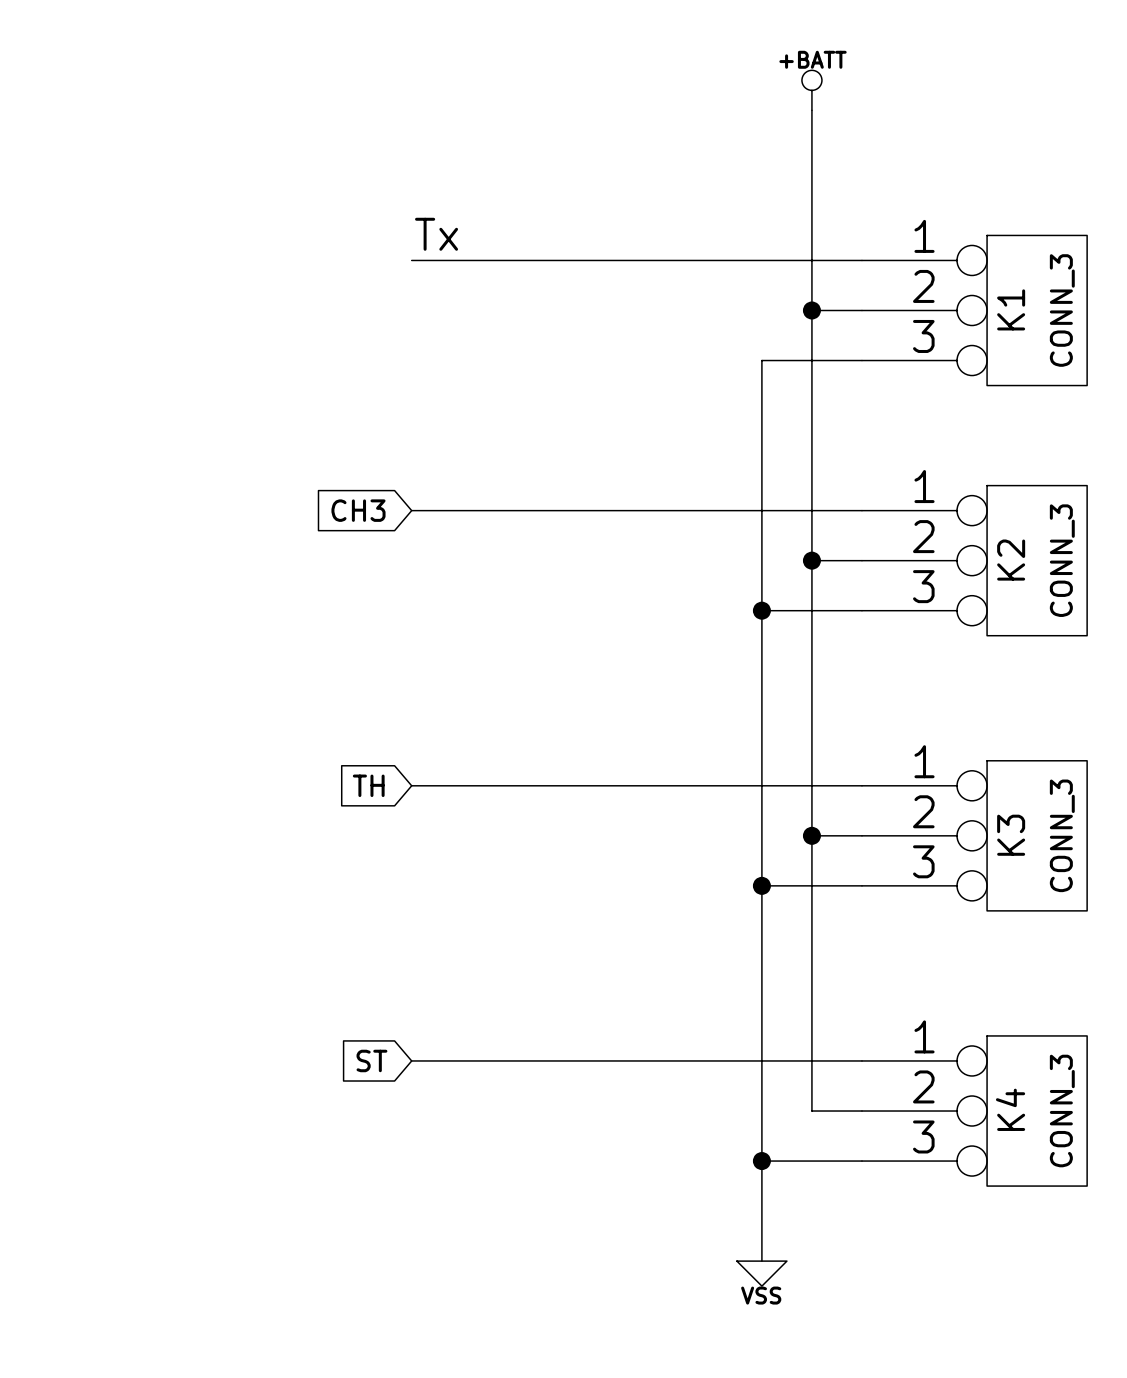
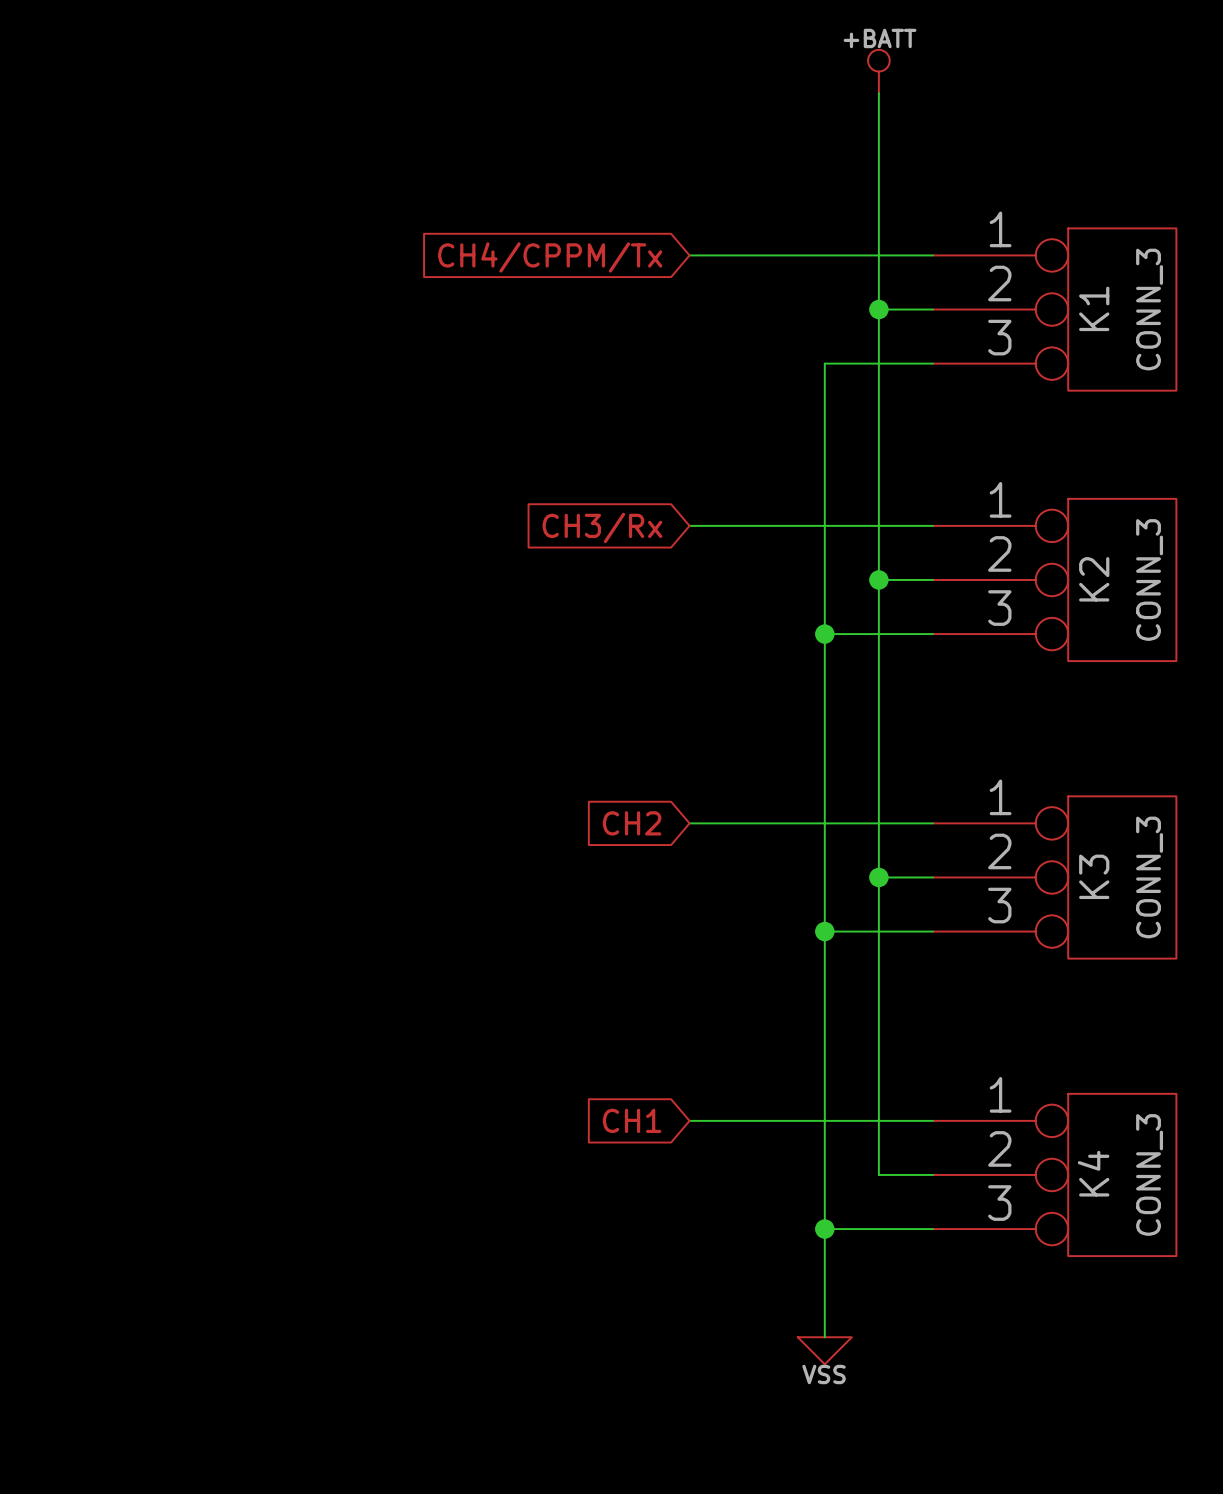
label: Tx (436, 234) -> none
wire: (411, 260) (636, 260) -> none
global label: none -> CH4/CPPM/Tx (550, 257)
global label: CH3 (358, 510) -> none
wire: (411, 510) (636, 510) -> none
global label: none -> CH3/Rx (602, 527)
global label: TH (368, 785) -> none
wire: (411, 785) (636, 785) -> none
global label: none -> CH2 (632, 823)
global label: ST (371, 1060) -> none
wire: (411, 1060) (636, 1060) -> none
global label: none -> CH1 (632, 1120)

